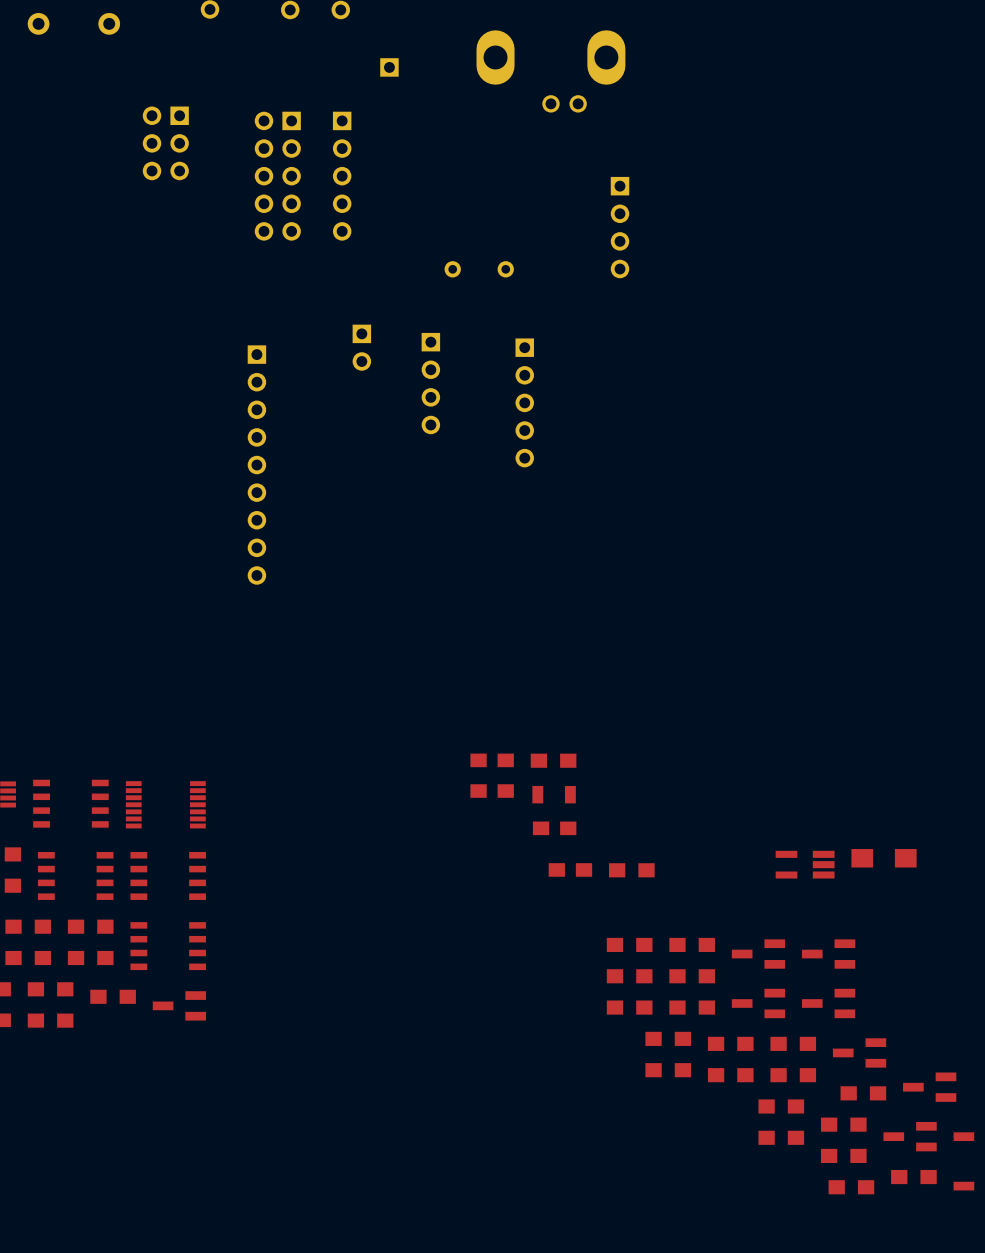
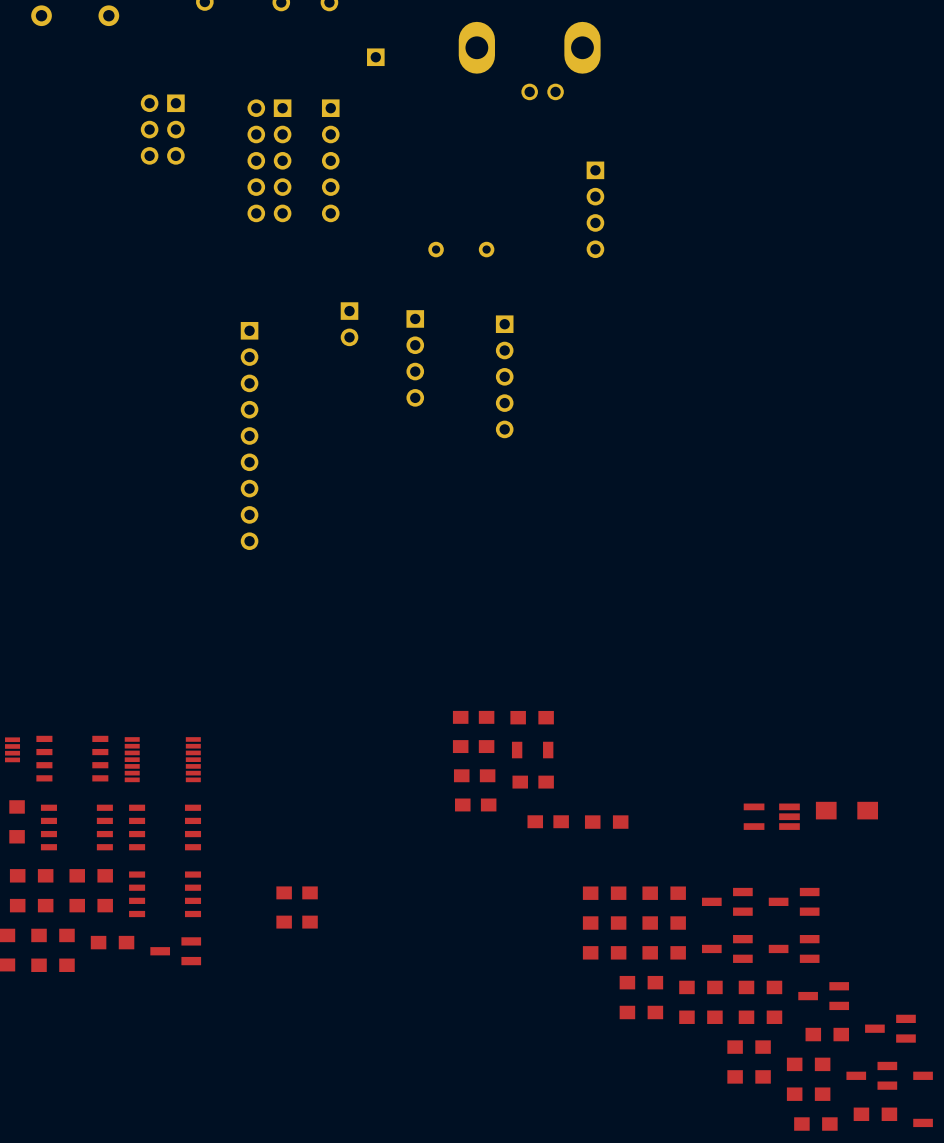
part: none -> (474, 775)
part: none -> (475, 804)
part: none -> (297, 892)
part: none -> (297, 922)

